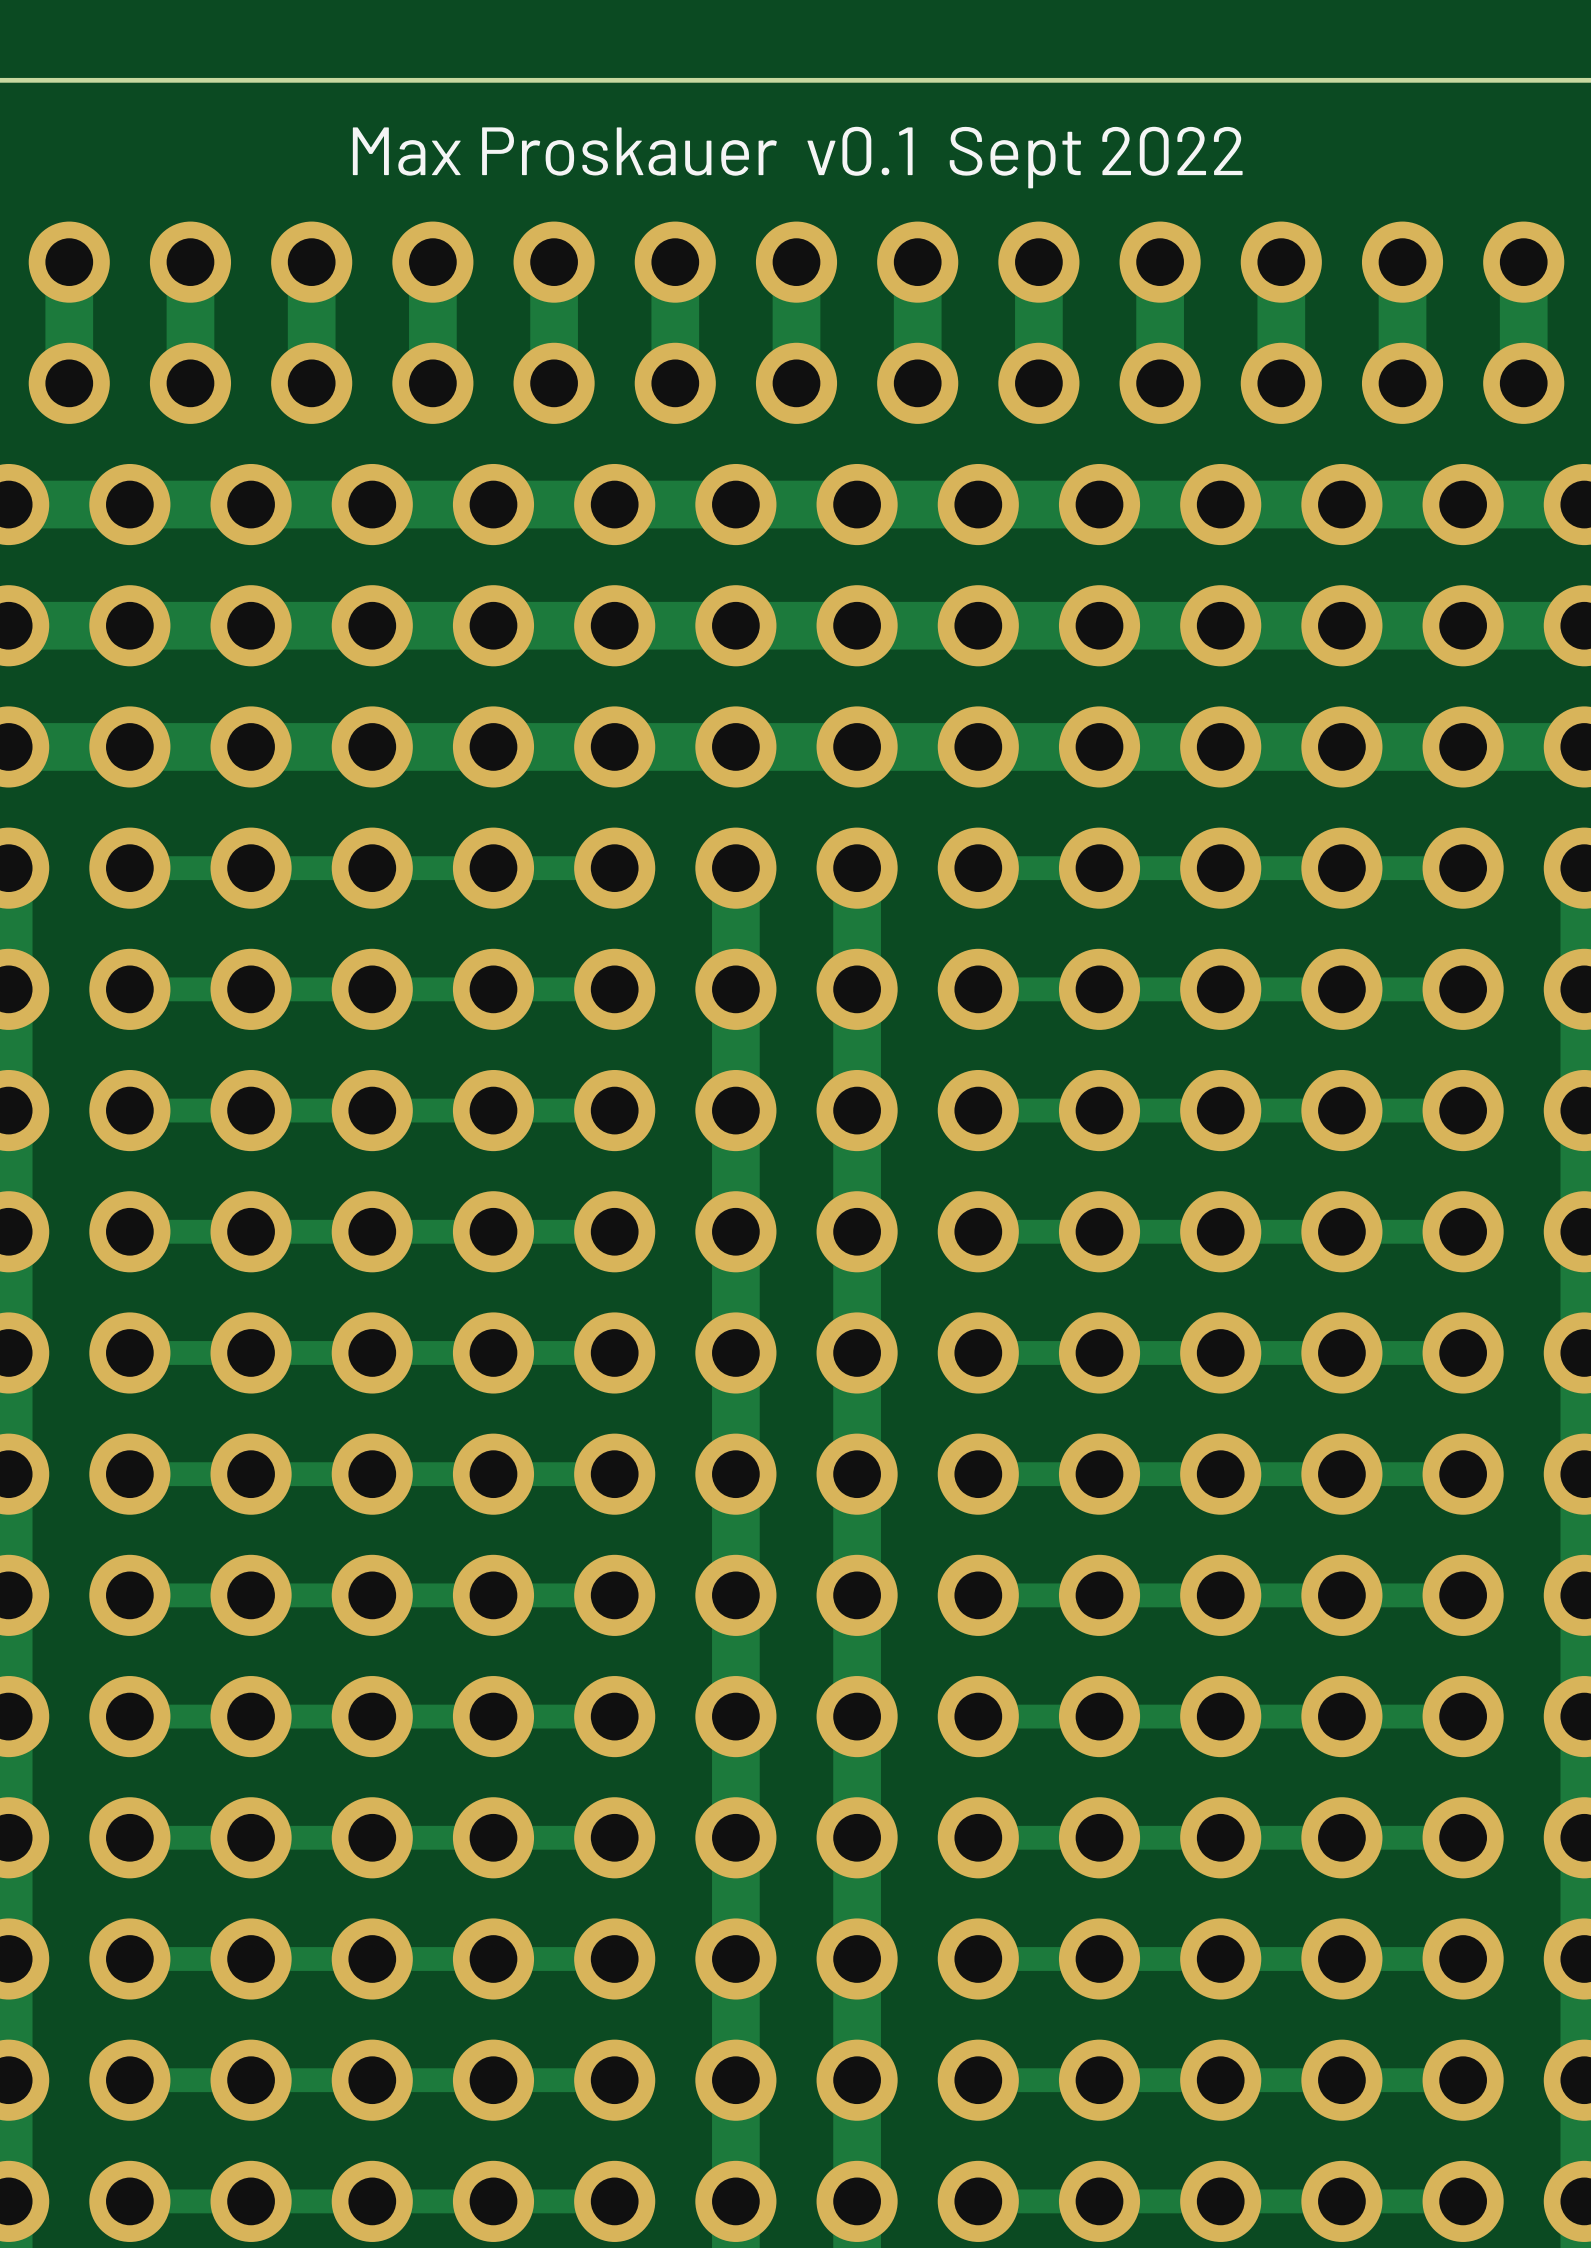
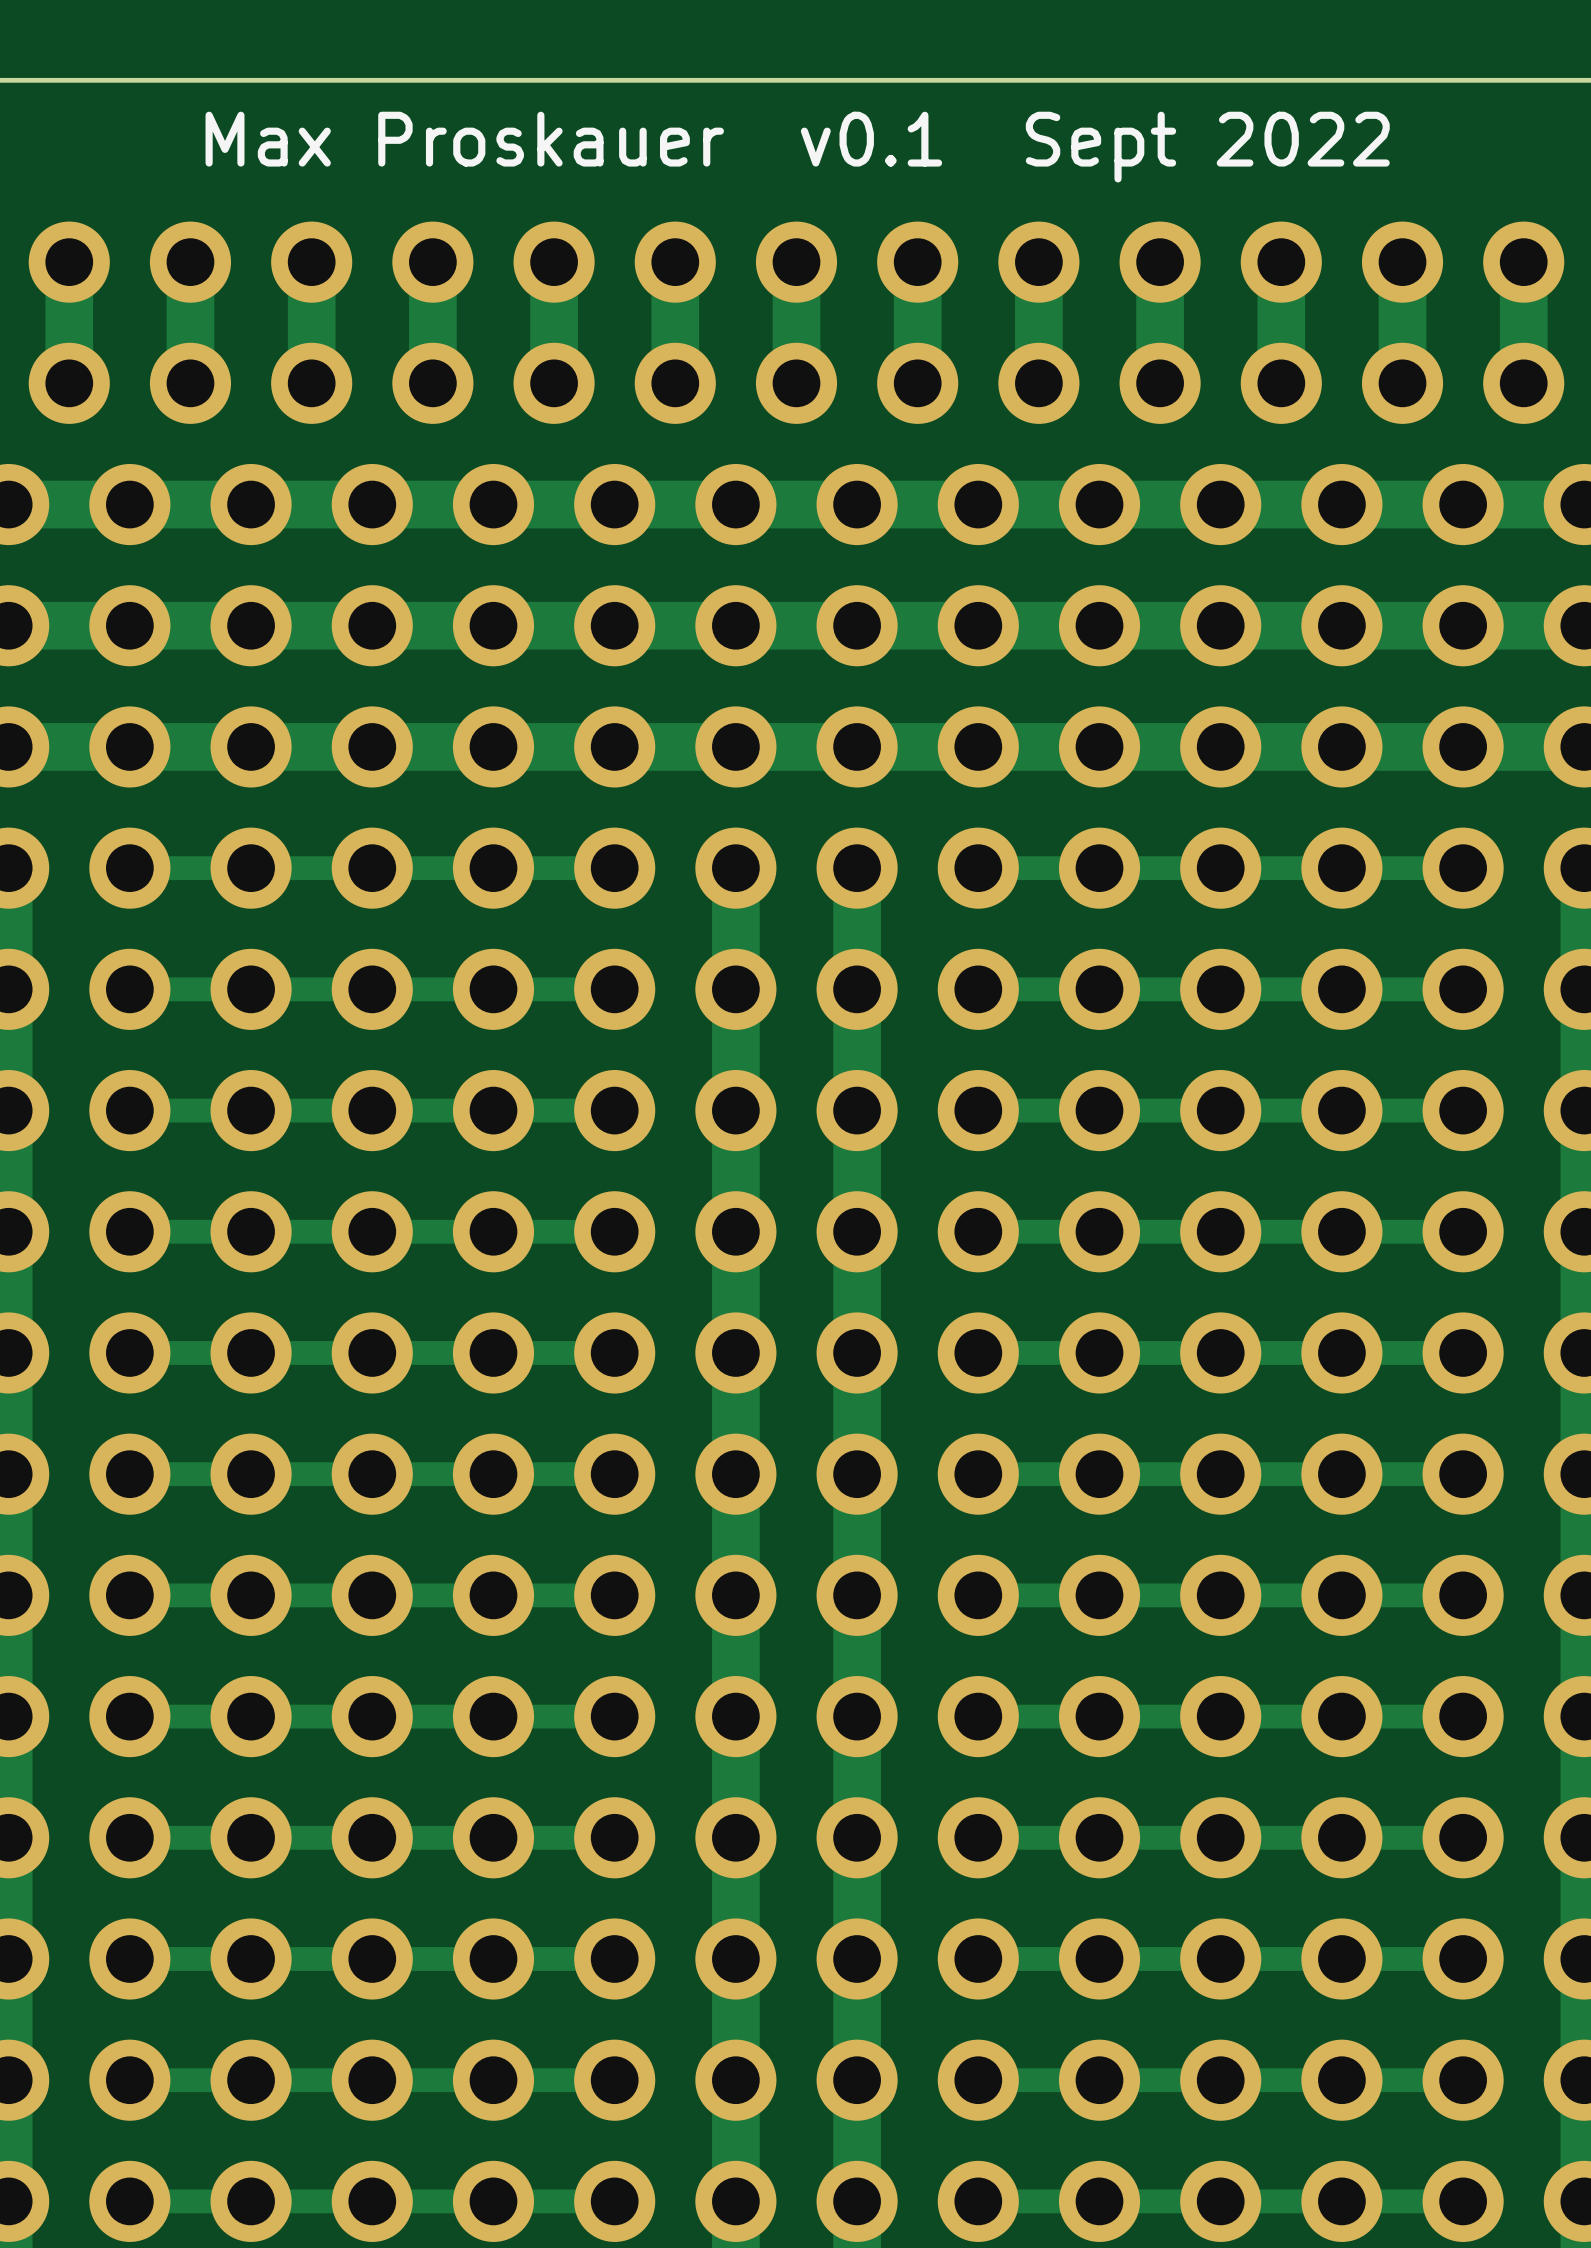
text position: Max Proskauer v0.1 Sept 2022 (797, 157) -> Max Proskauer v0.1 Sept 2022 (797, 147)

